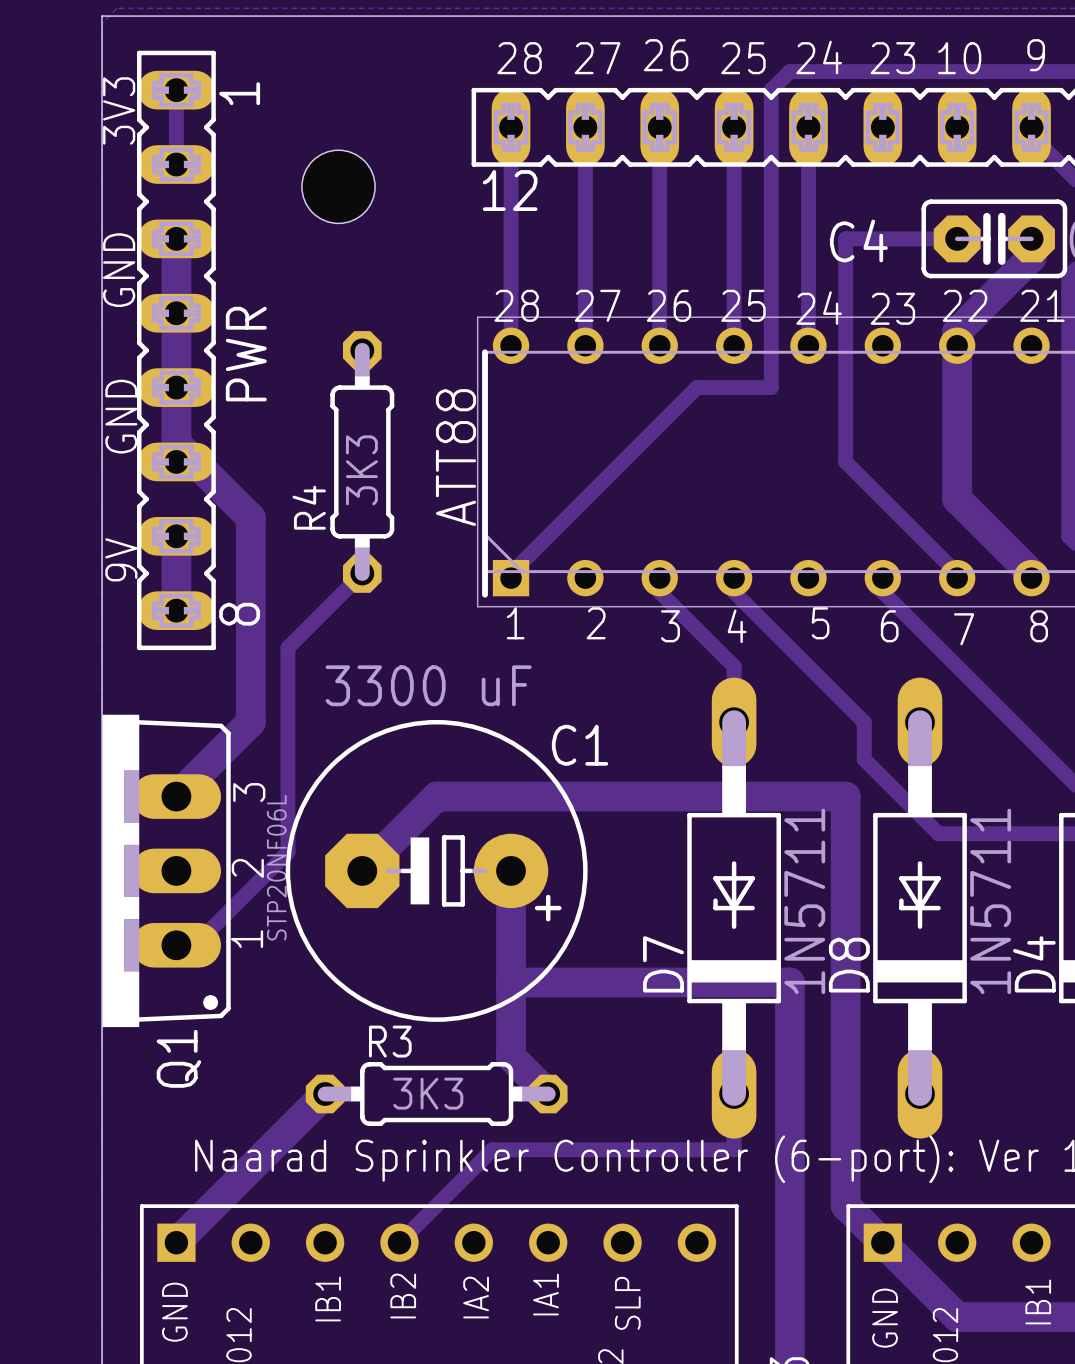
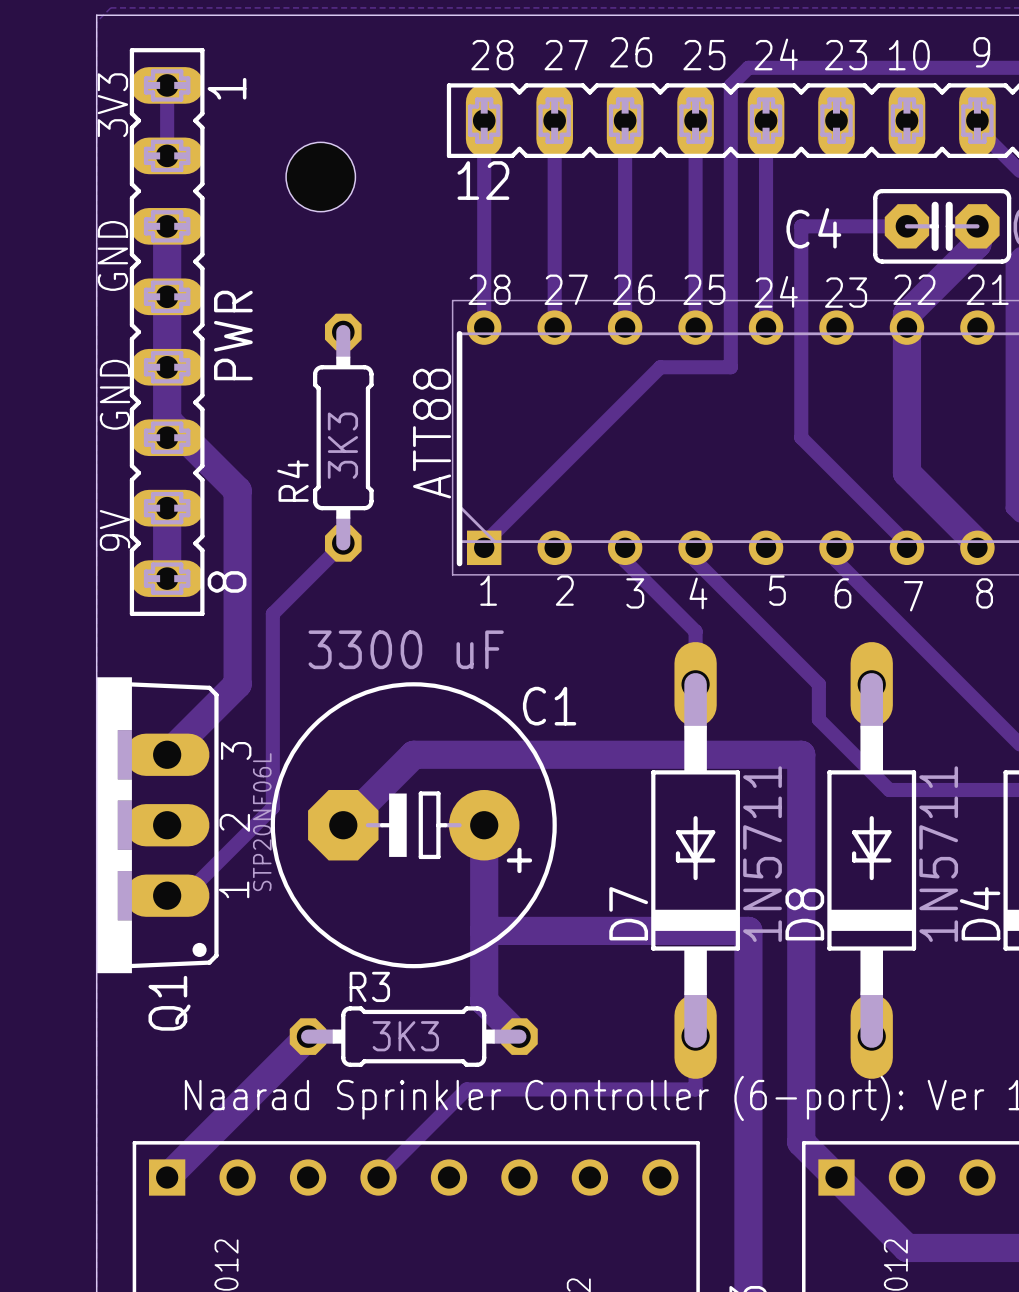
text: IA1 (545, 1294) -> none
text: IB2 (403, 1296) -> none
text: IA2 (476, 1297) -> none
text: IB1 (328, 1298) -> none
text: IB1 (1038, 1301) -> none
text: SLP (627, 1303) -> none
text: GND (174, 1312) -> none
text: GND (885, 1318) -> none

